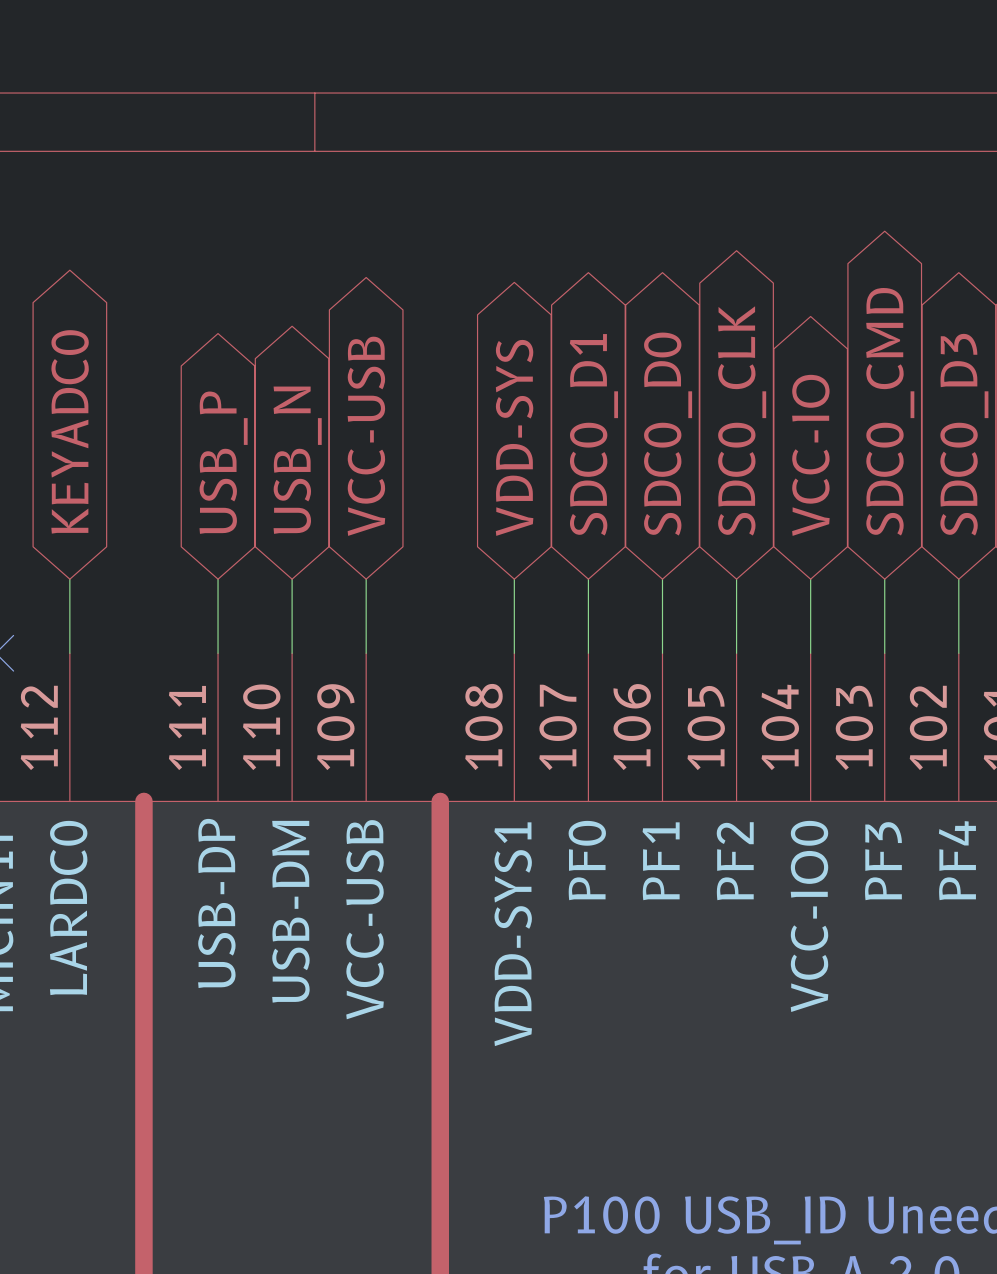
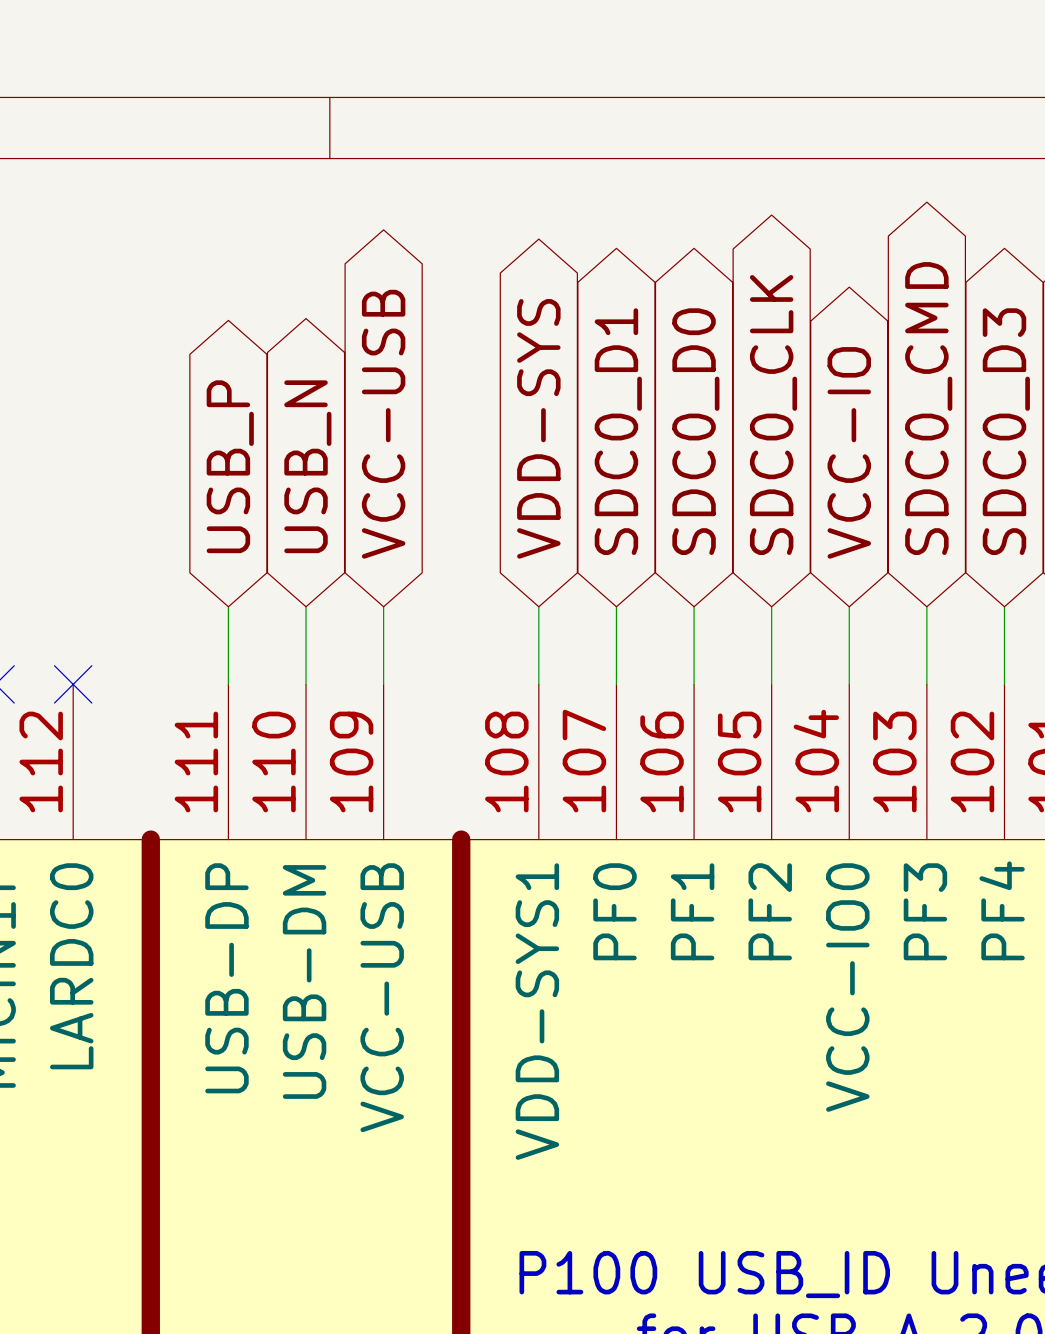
global label: KEYADC0 (70, 431) -> none
wire: (69, 579) (69, 653) -> none
no-connect mark: none -> (73, 684)

